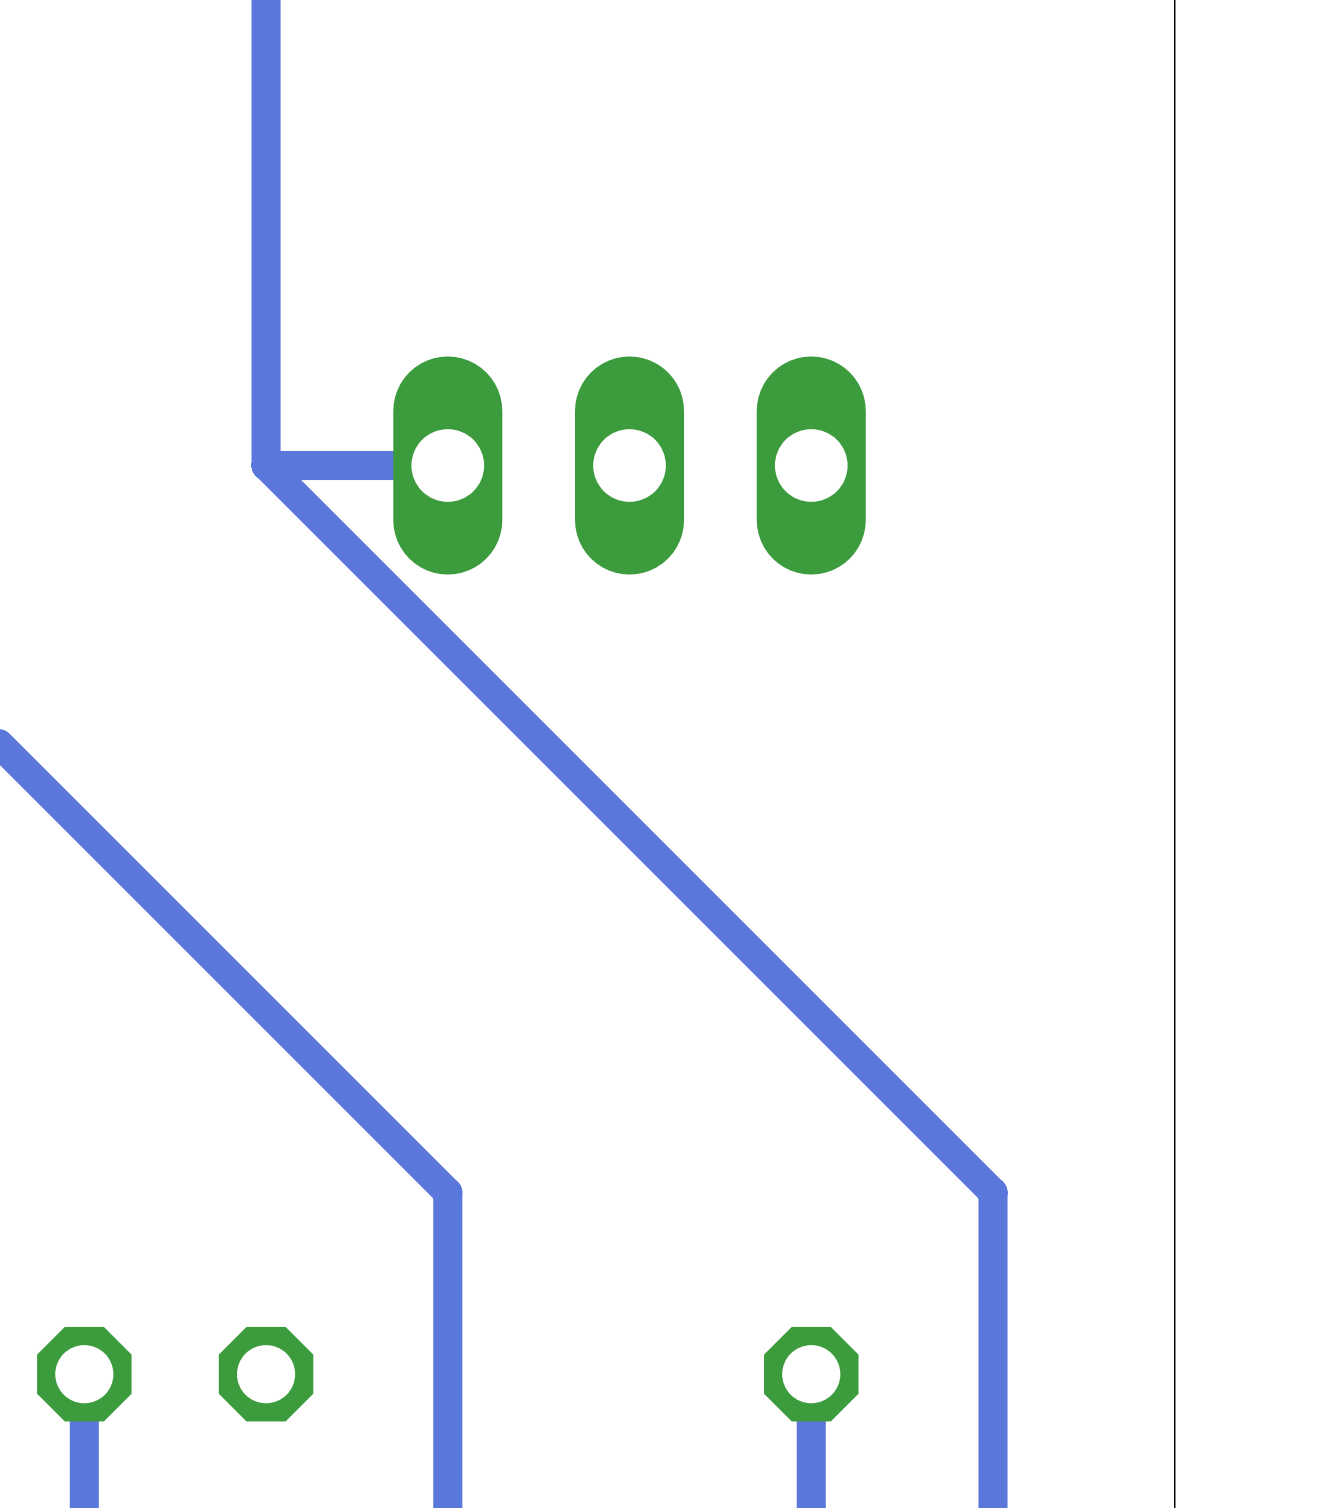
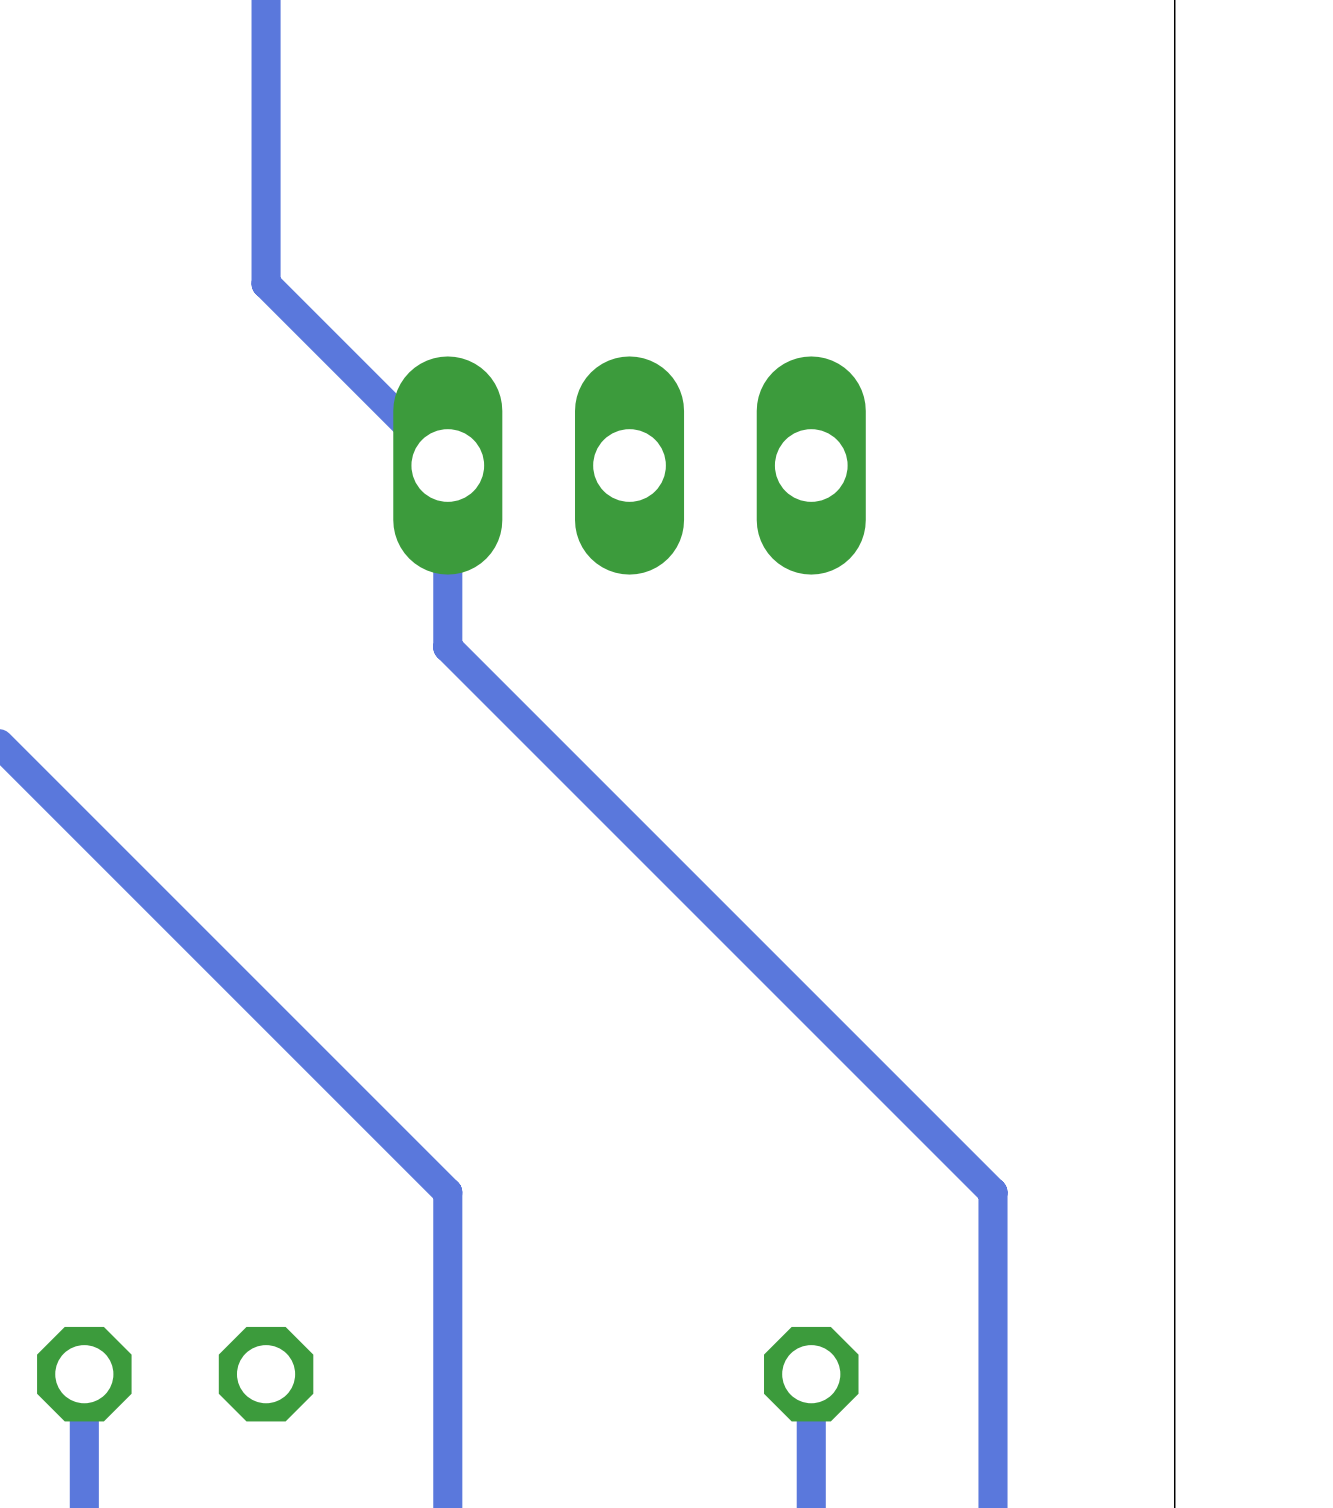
track: (266, 283) (266, 465) -> none
track: (266, 465) (447, 647) -> (266, 283) (447, 465) (447, 647)
track: (447, 465) (266, 465) -> none

